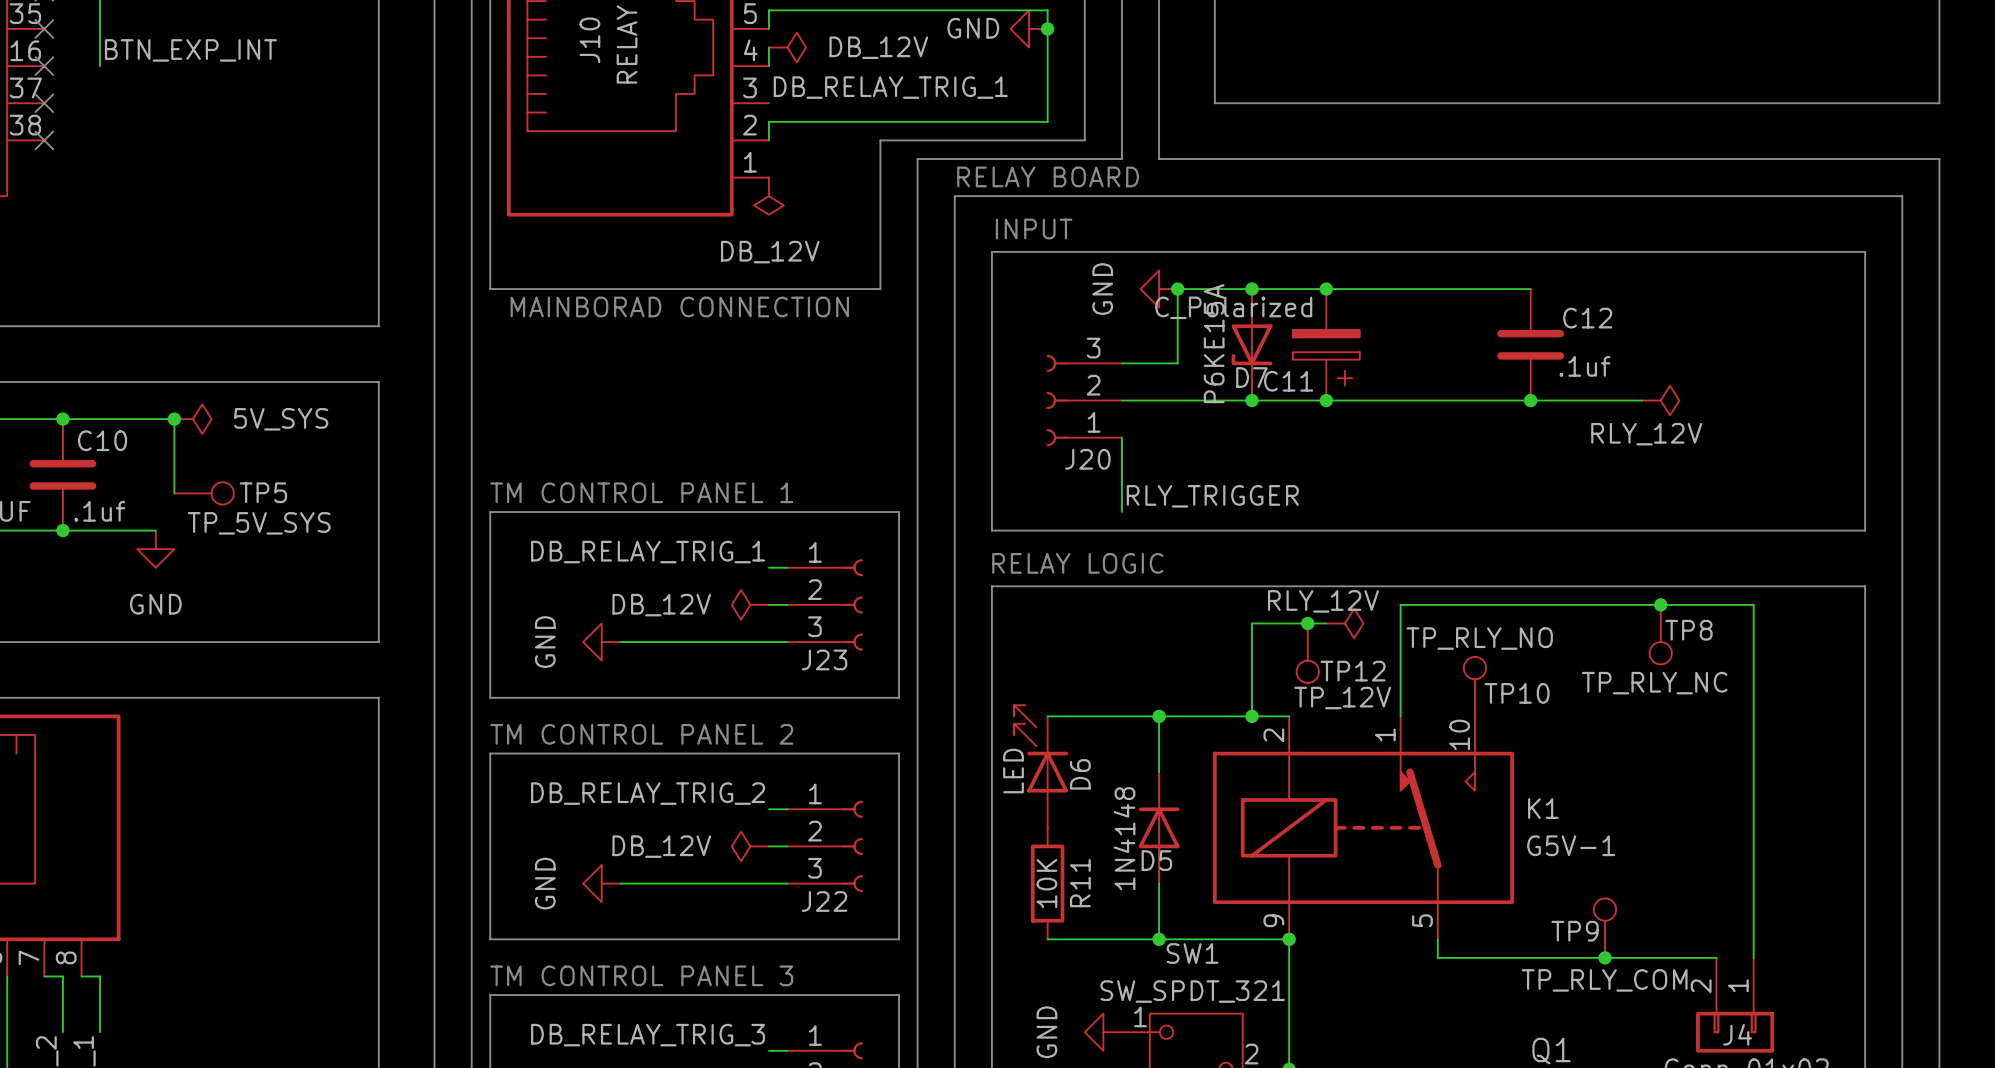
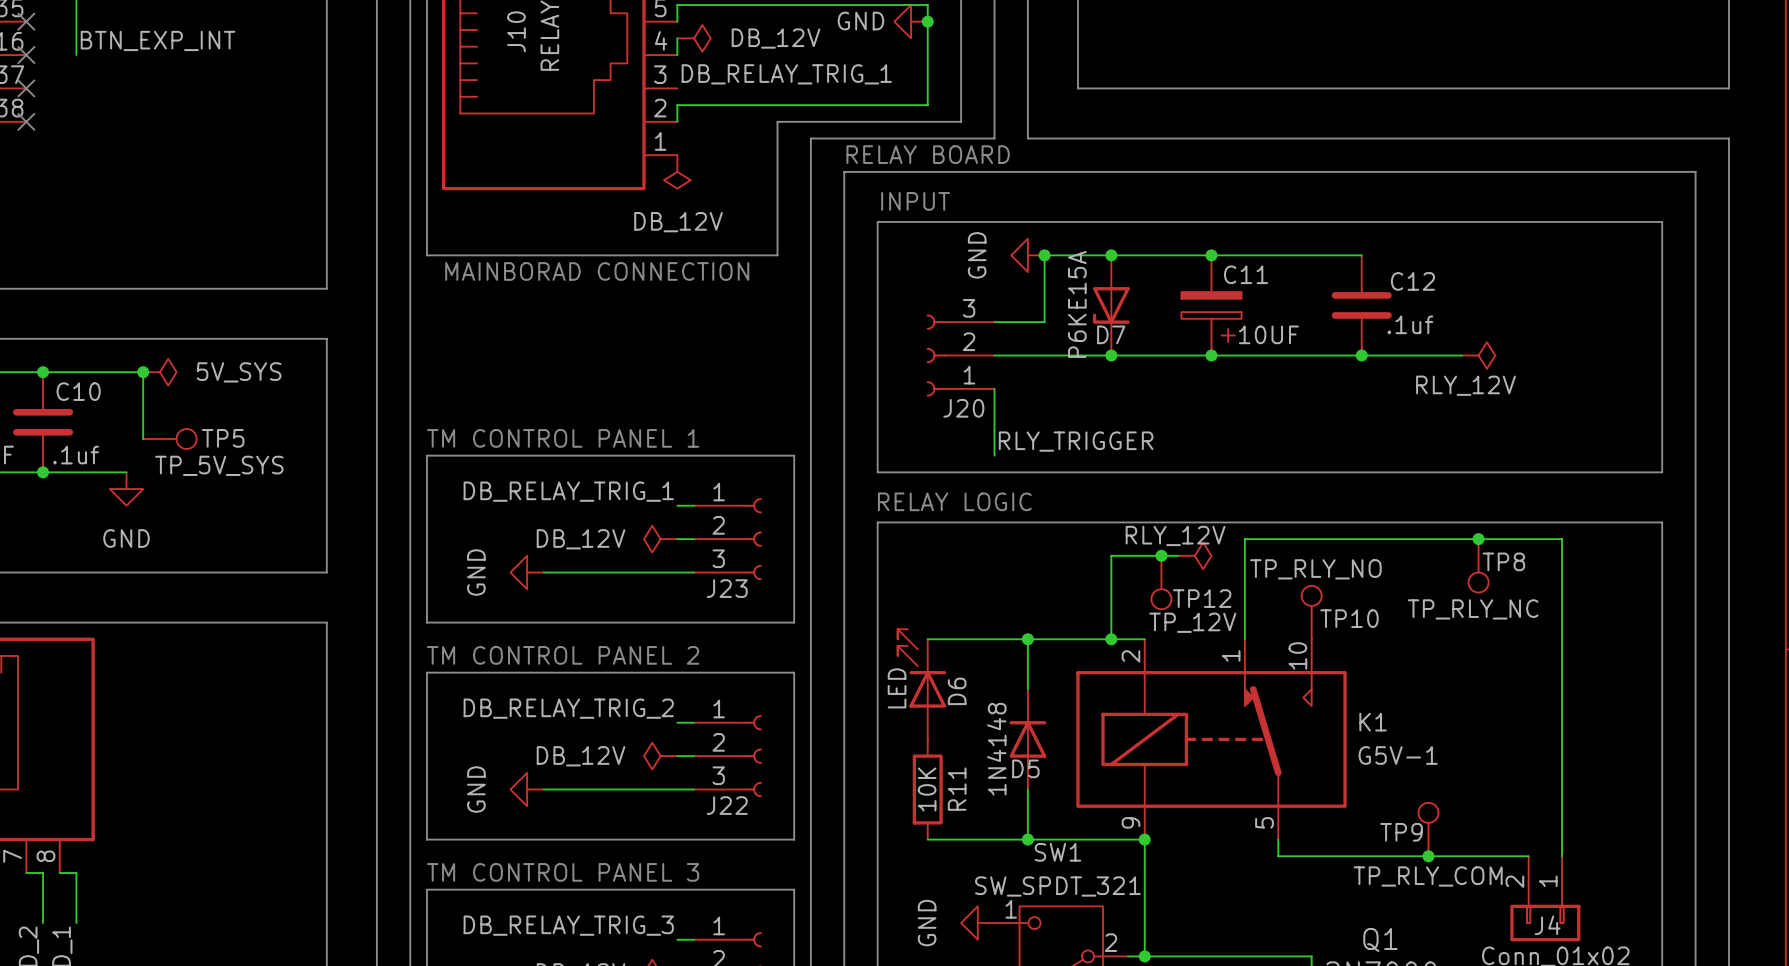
junction position: (1326, 289) -> (1211, 255)
C11 value: C_Polarized (1233, 307) -> 10UF (1268, 334)
C11 position: (1326, 344) -> (1211, 305)
C11 name position: C11 (1288, 381) -> C11 (1246, 274)
junction position: (1326, 400) -> (1211, 355)

